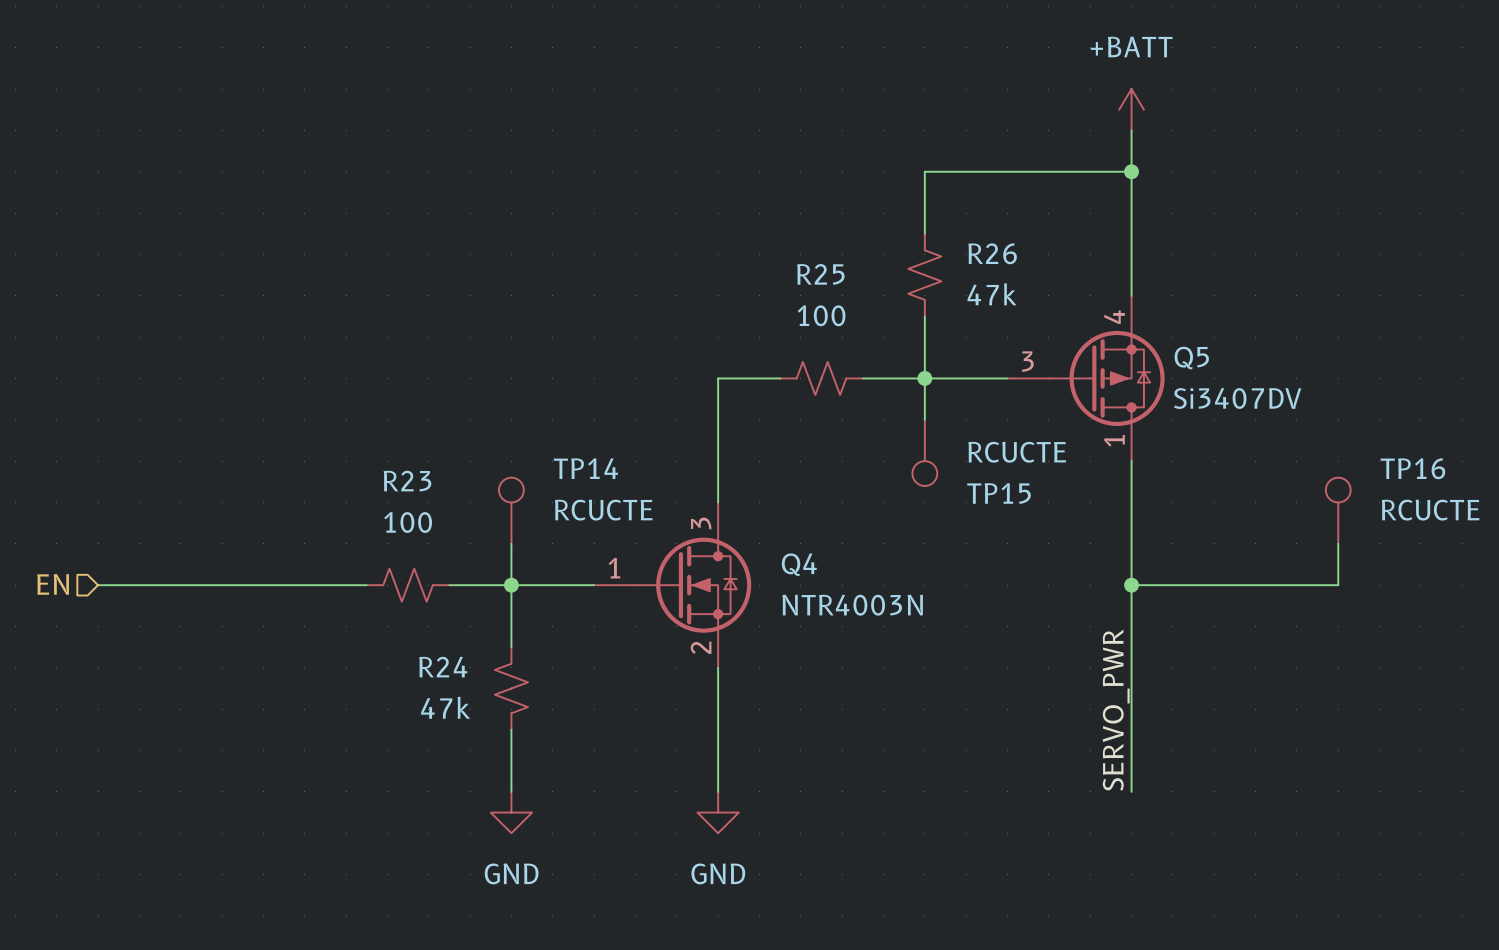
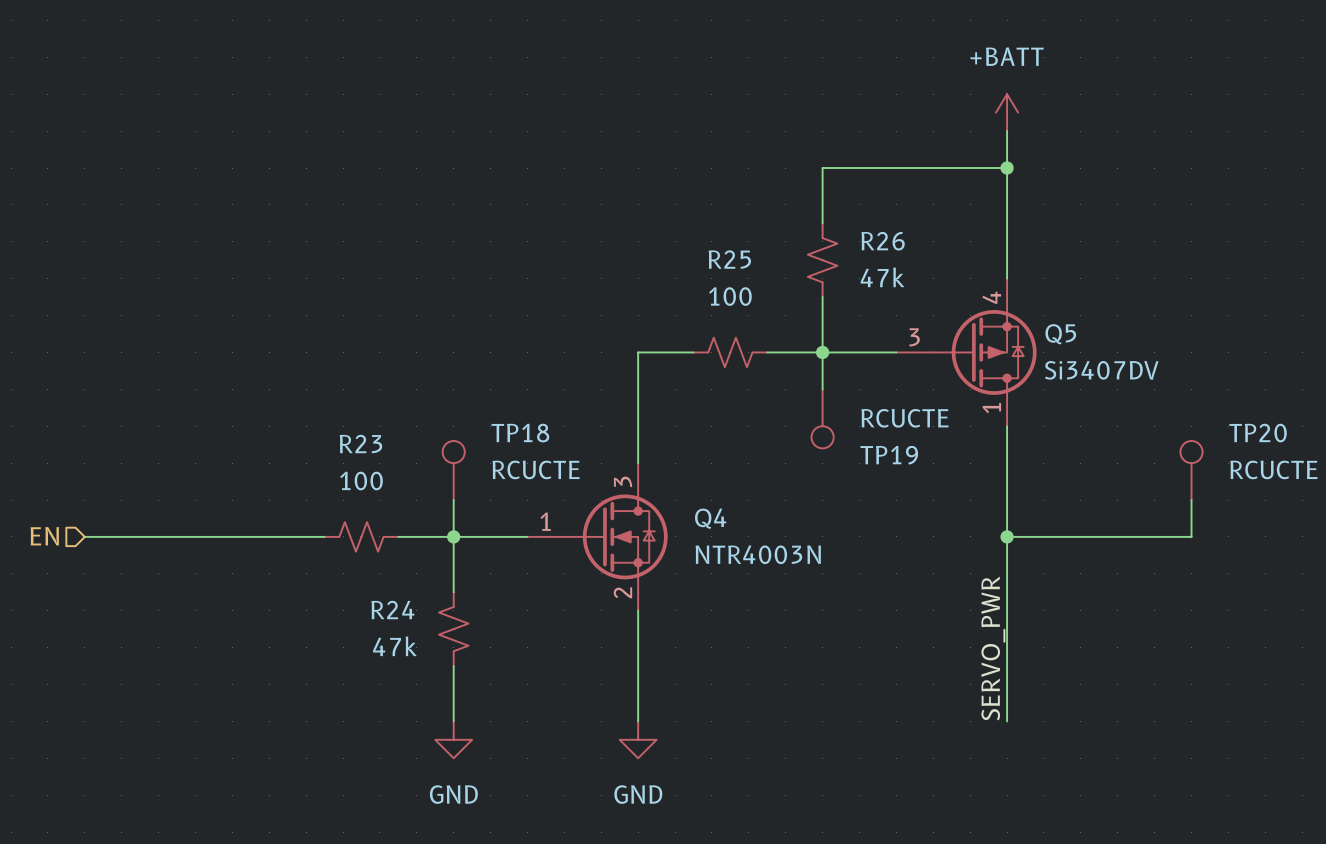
TP14 name: TP14 (585, 468) -> TP18 (520, 433)
TP16 name: TP16 (1412, 468) -> TP20 (1258, 433)
TP15 name: TP15 (999, 493) -> TP19 (889, 455)

